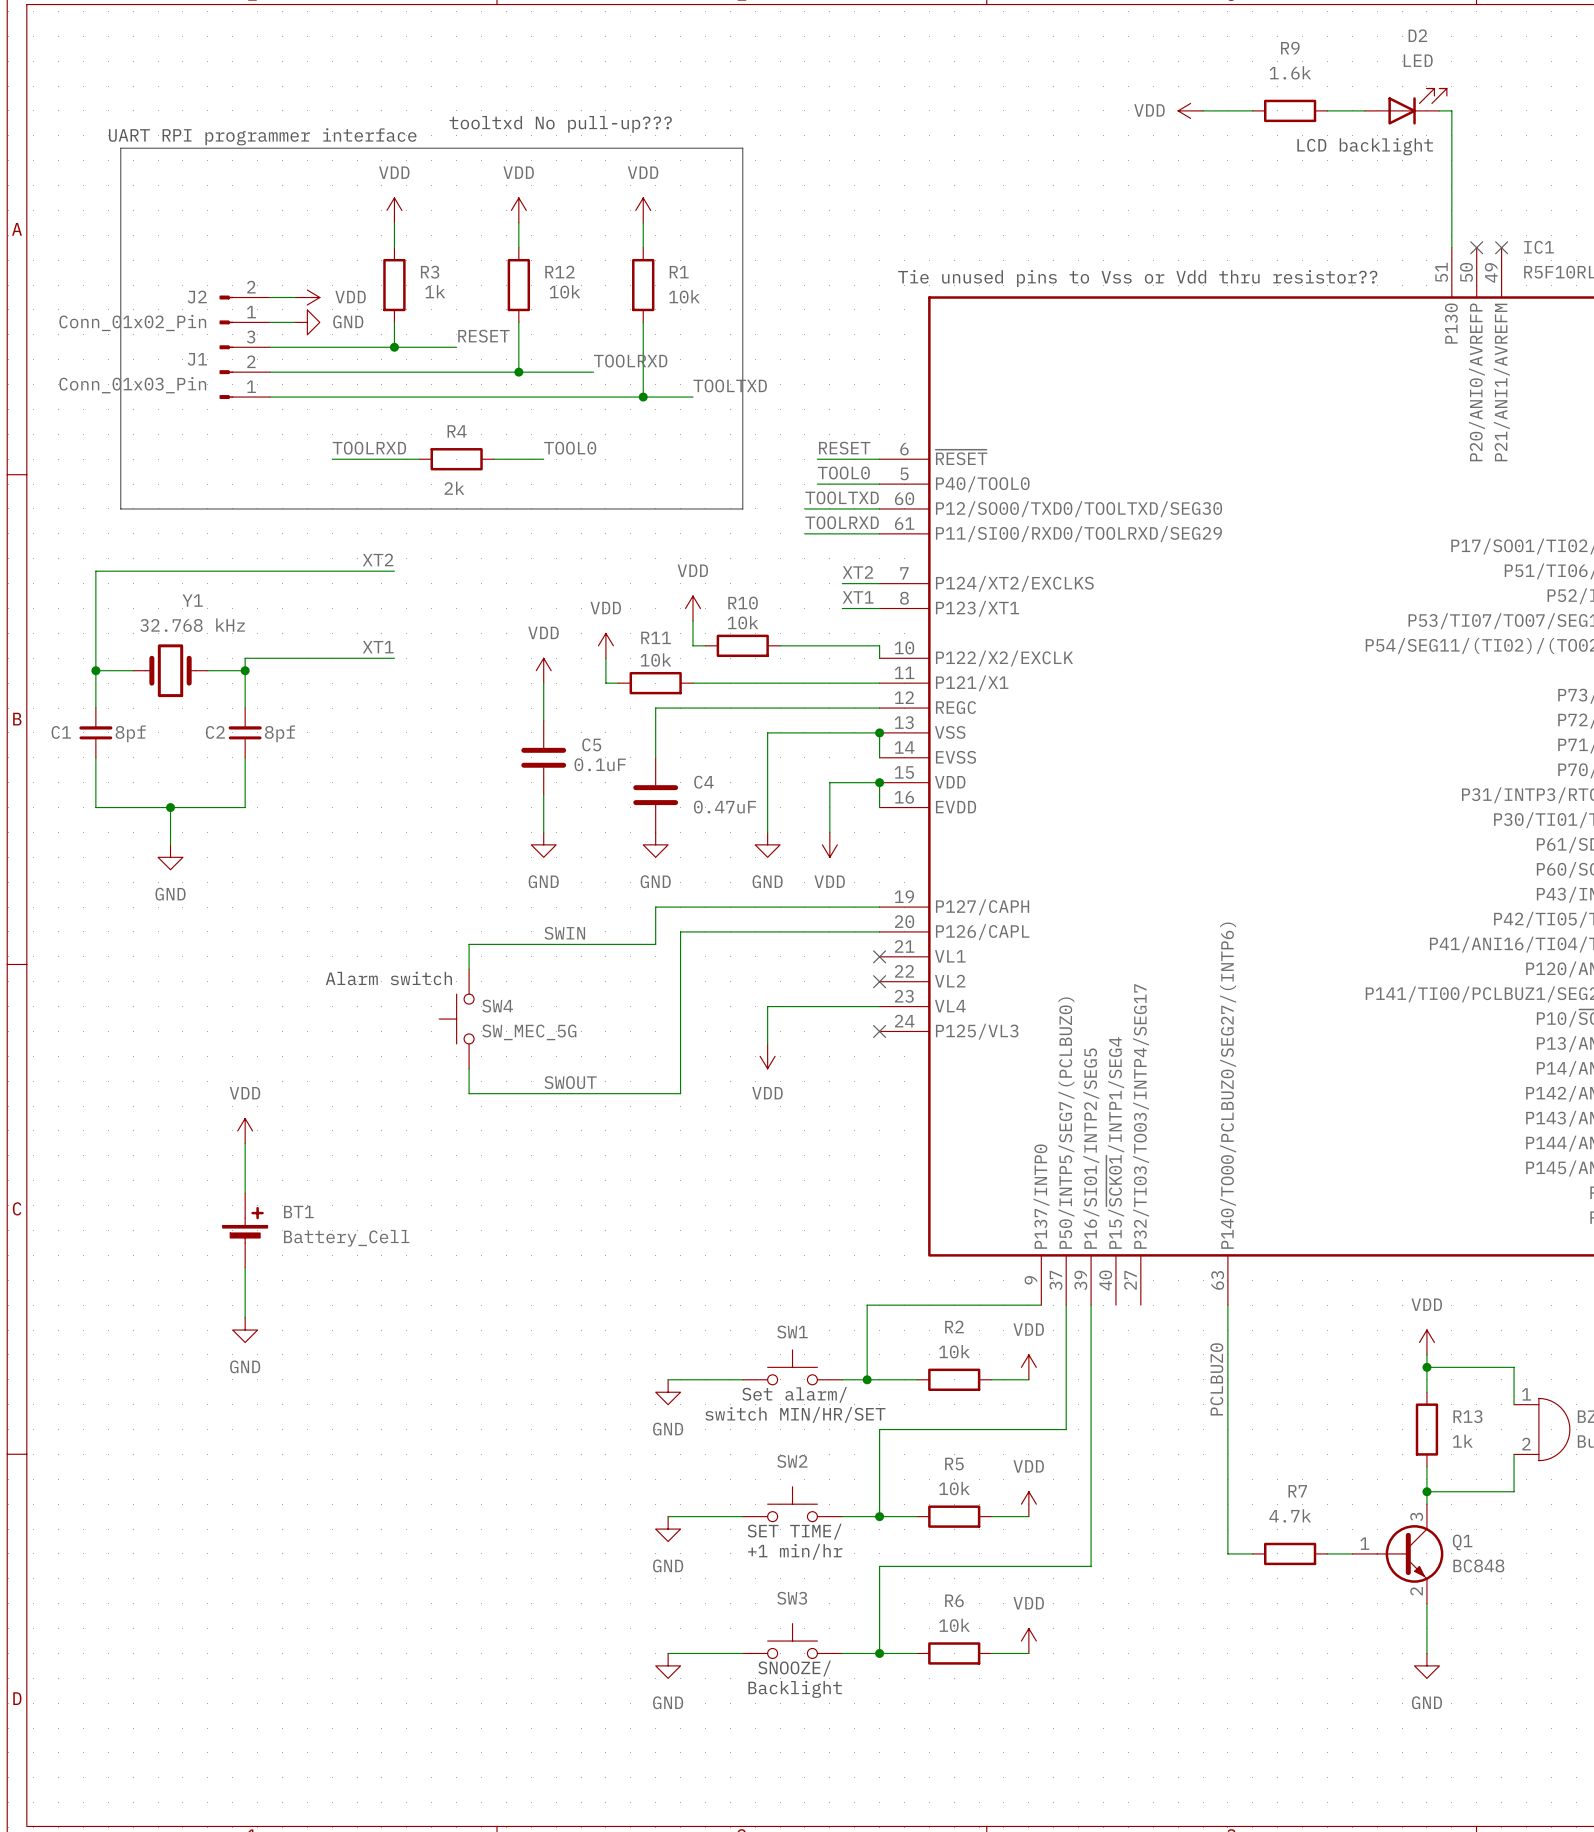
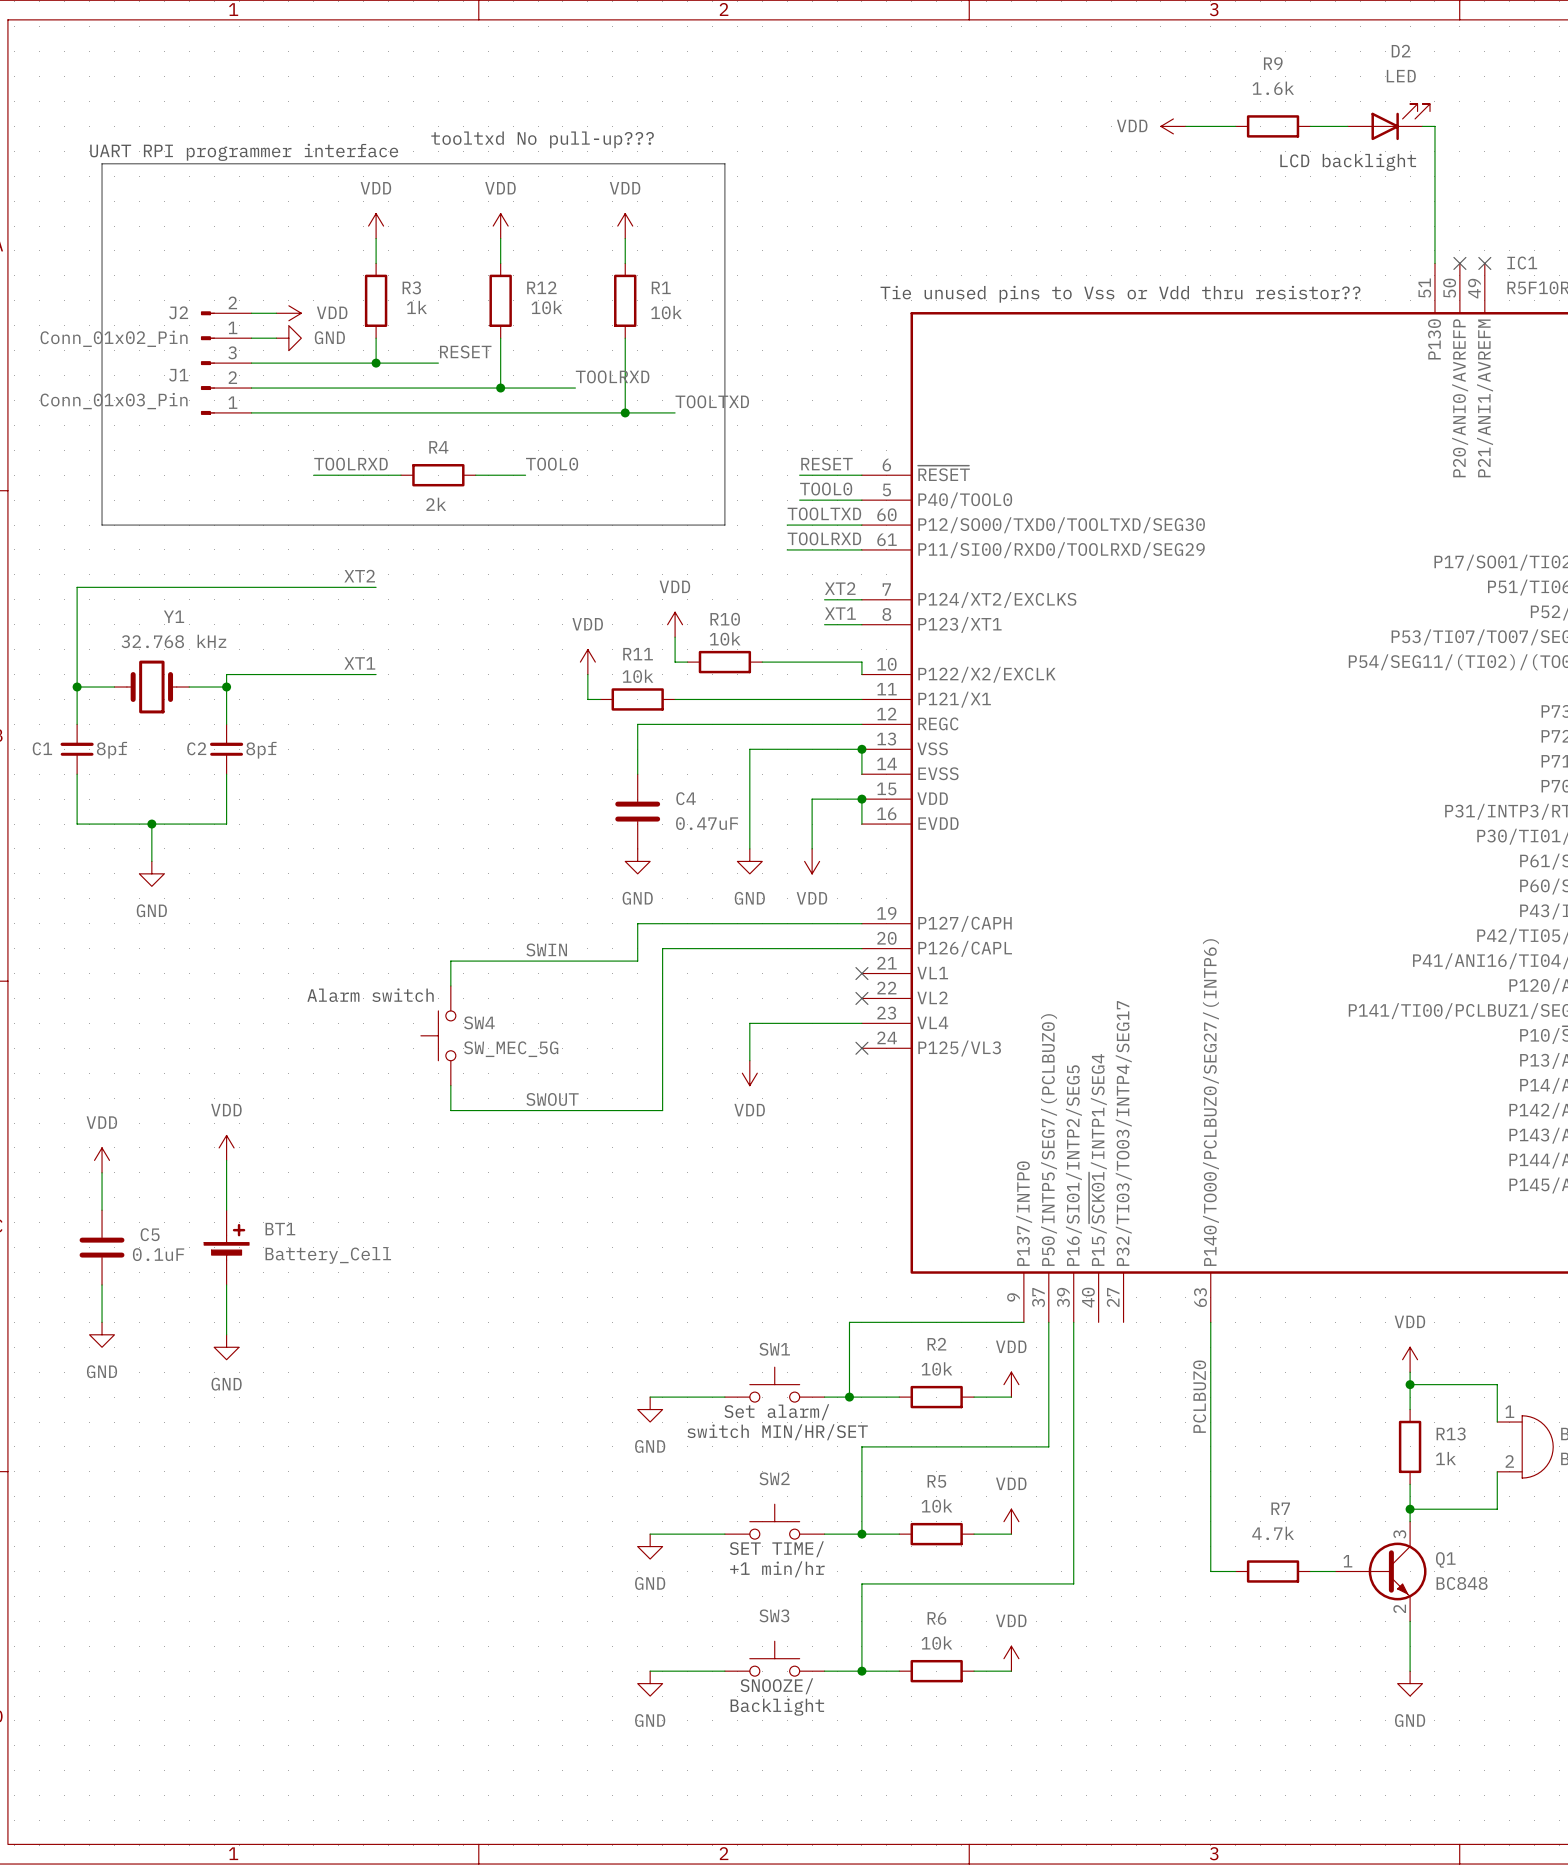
power symbol: VDD (543, 670) -> none
wire: (543, 683) (543, 720) -> none
C5 position: (543, 757) -> (102, 1247)
wire: (543, 795) (543, 832) -> none
power symbol: GND (543, 844) -> none
power symbol: none -> VDD (102, 1160)
wire: none -> (102, 1172) (102, 1210)
wire: none -> (102, 1284) (102, 1322)
power symbol: none -> GND (102, 1334)

